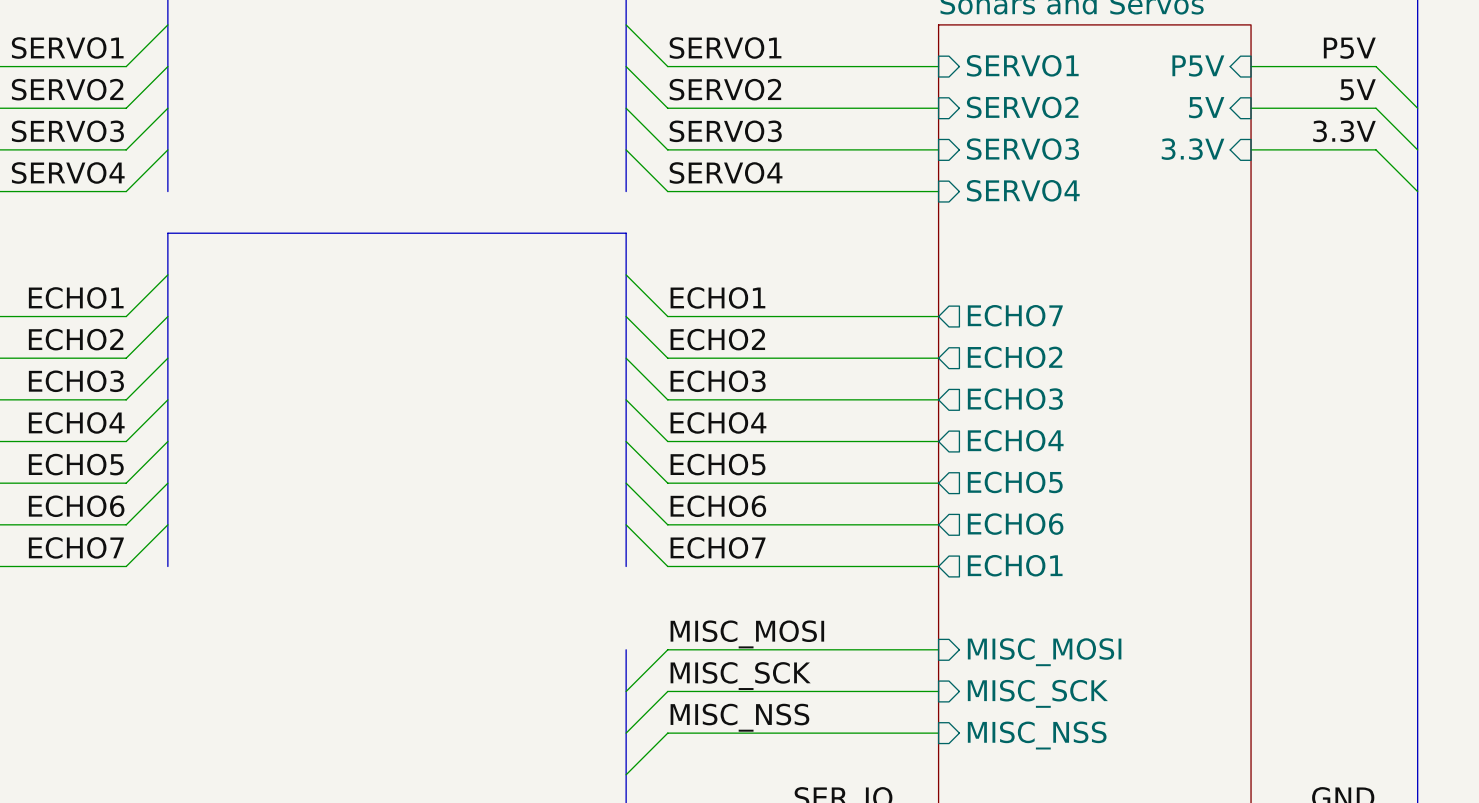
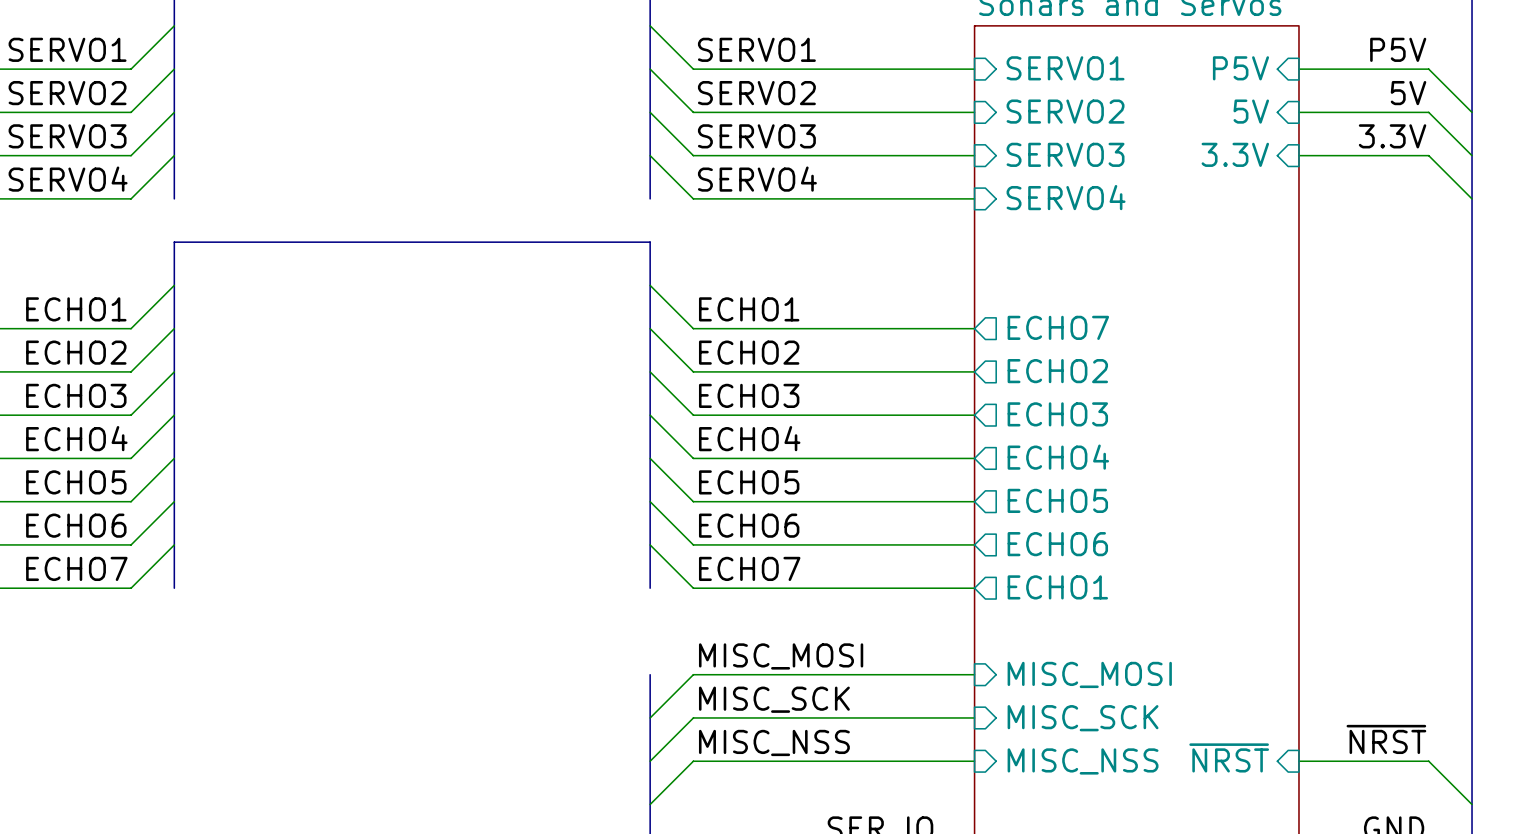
label: none -> ~{NRST} (1386, 739)
sheet pin: none -> ~{NRST} (1229, 757)
wire: none -> (1298, 761) (1428, 761) (1472, 804)

